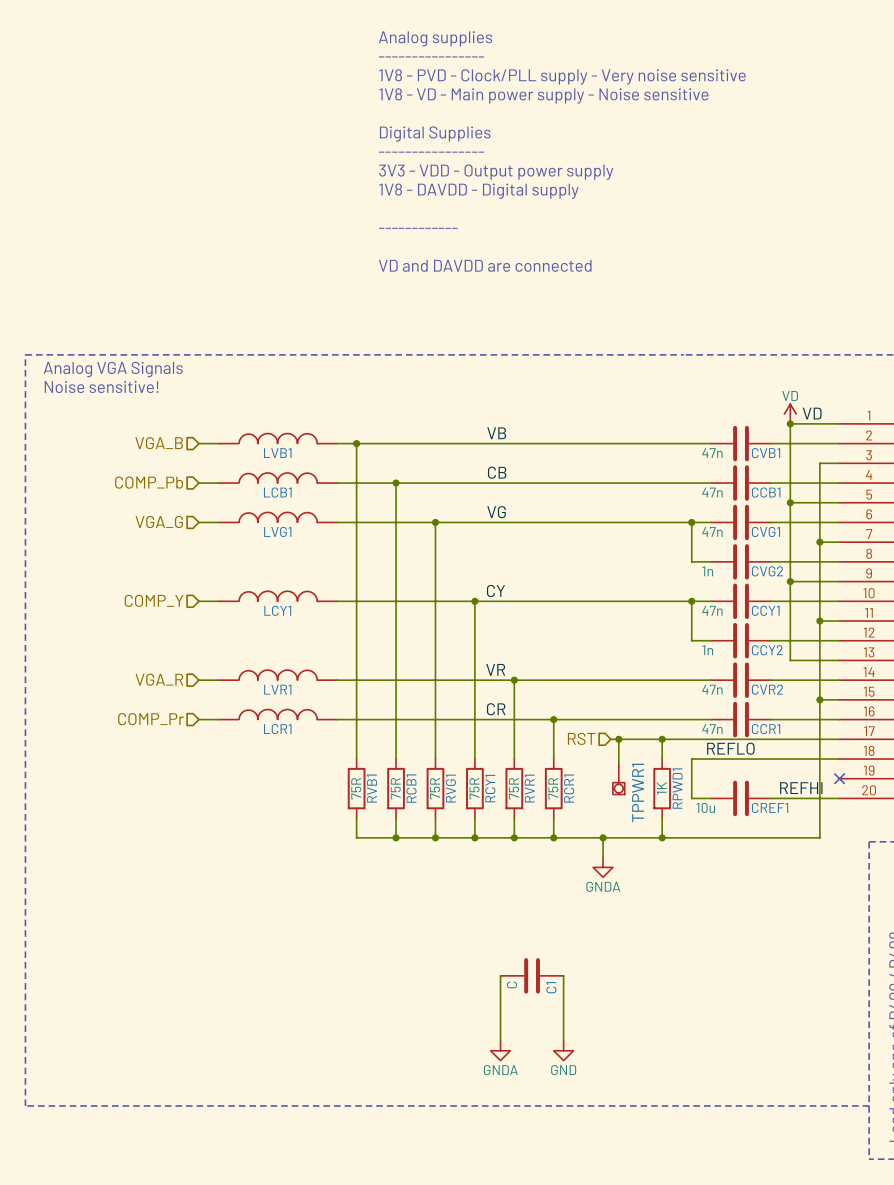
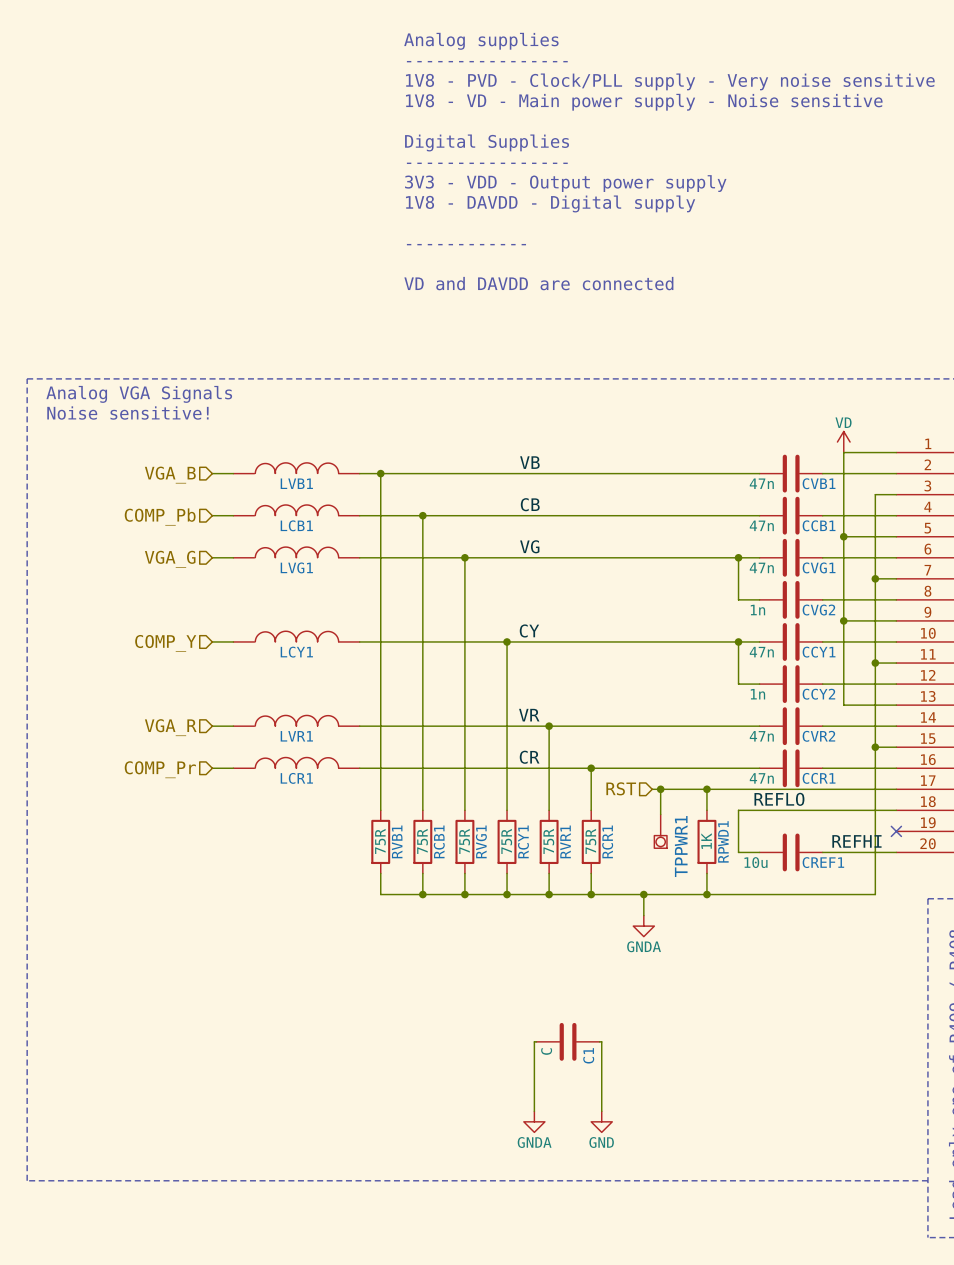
label: VD (812, 413) -> none
junction: (790, 423) -> none

